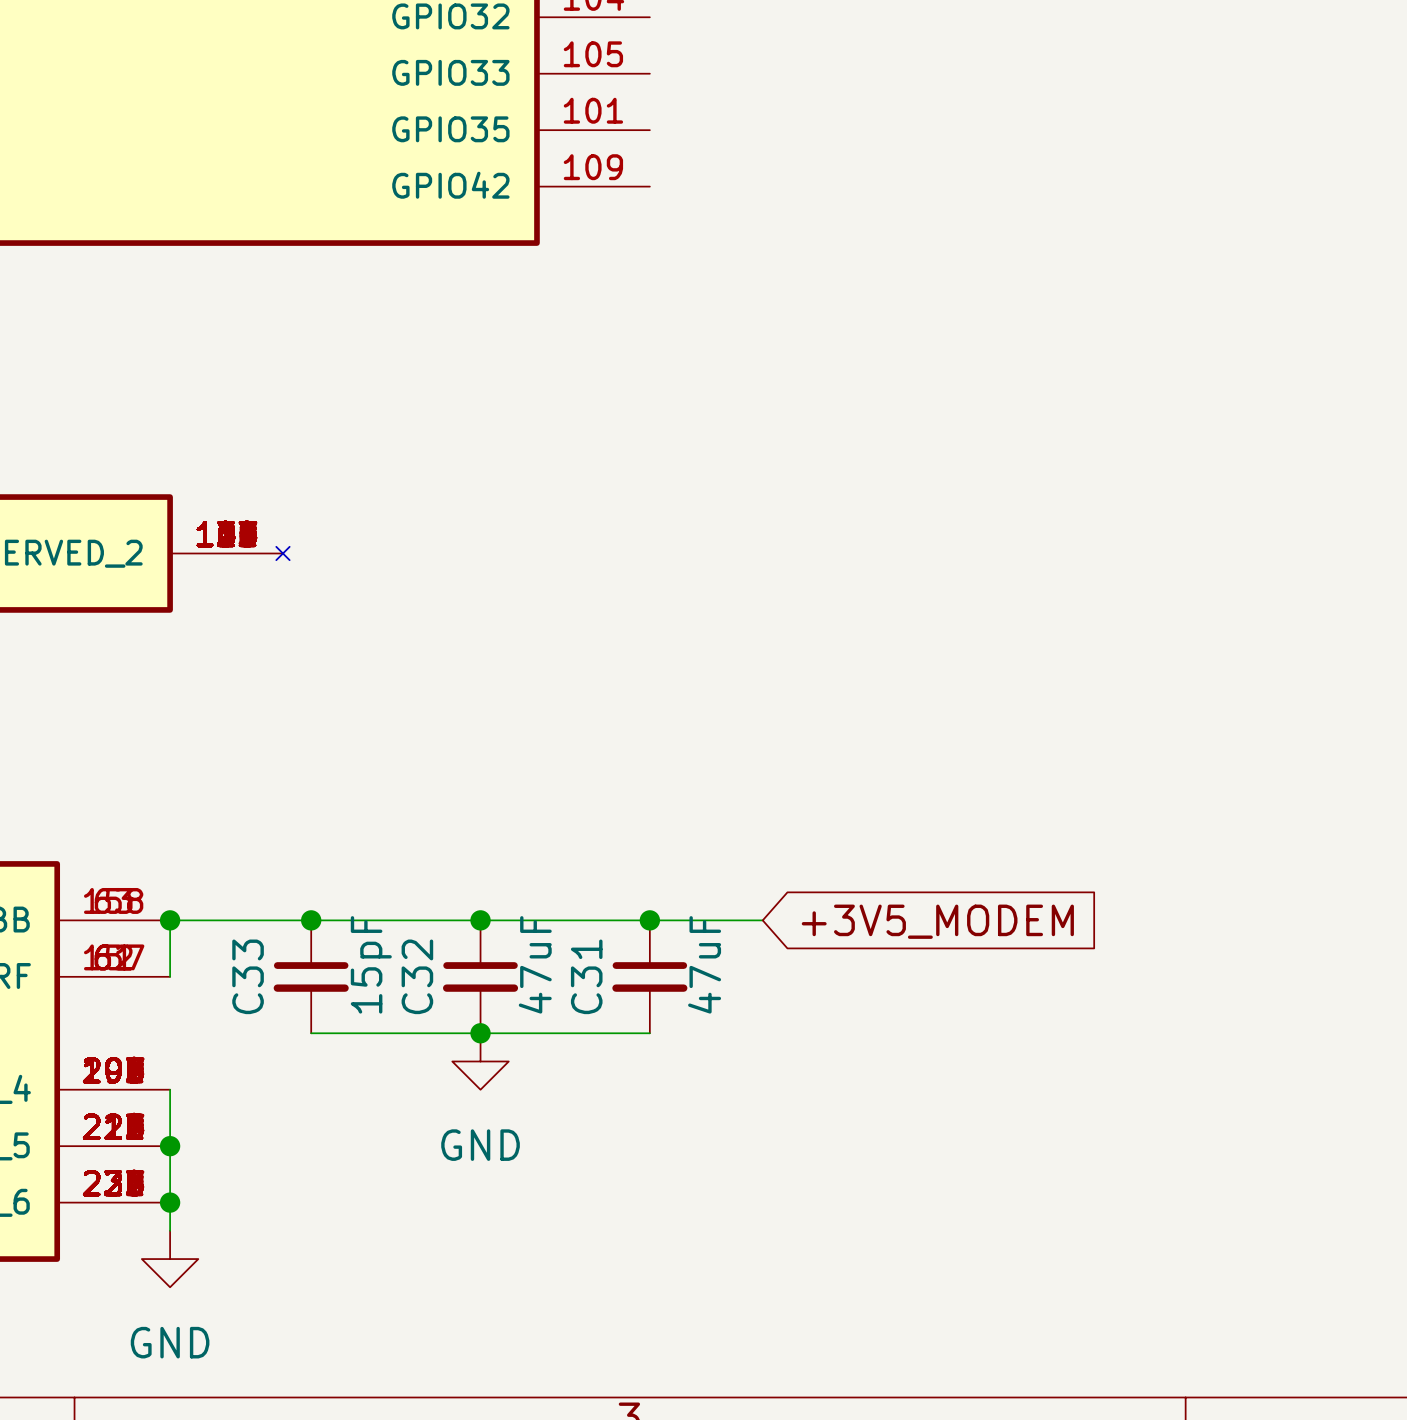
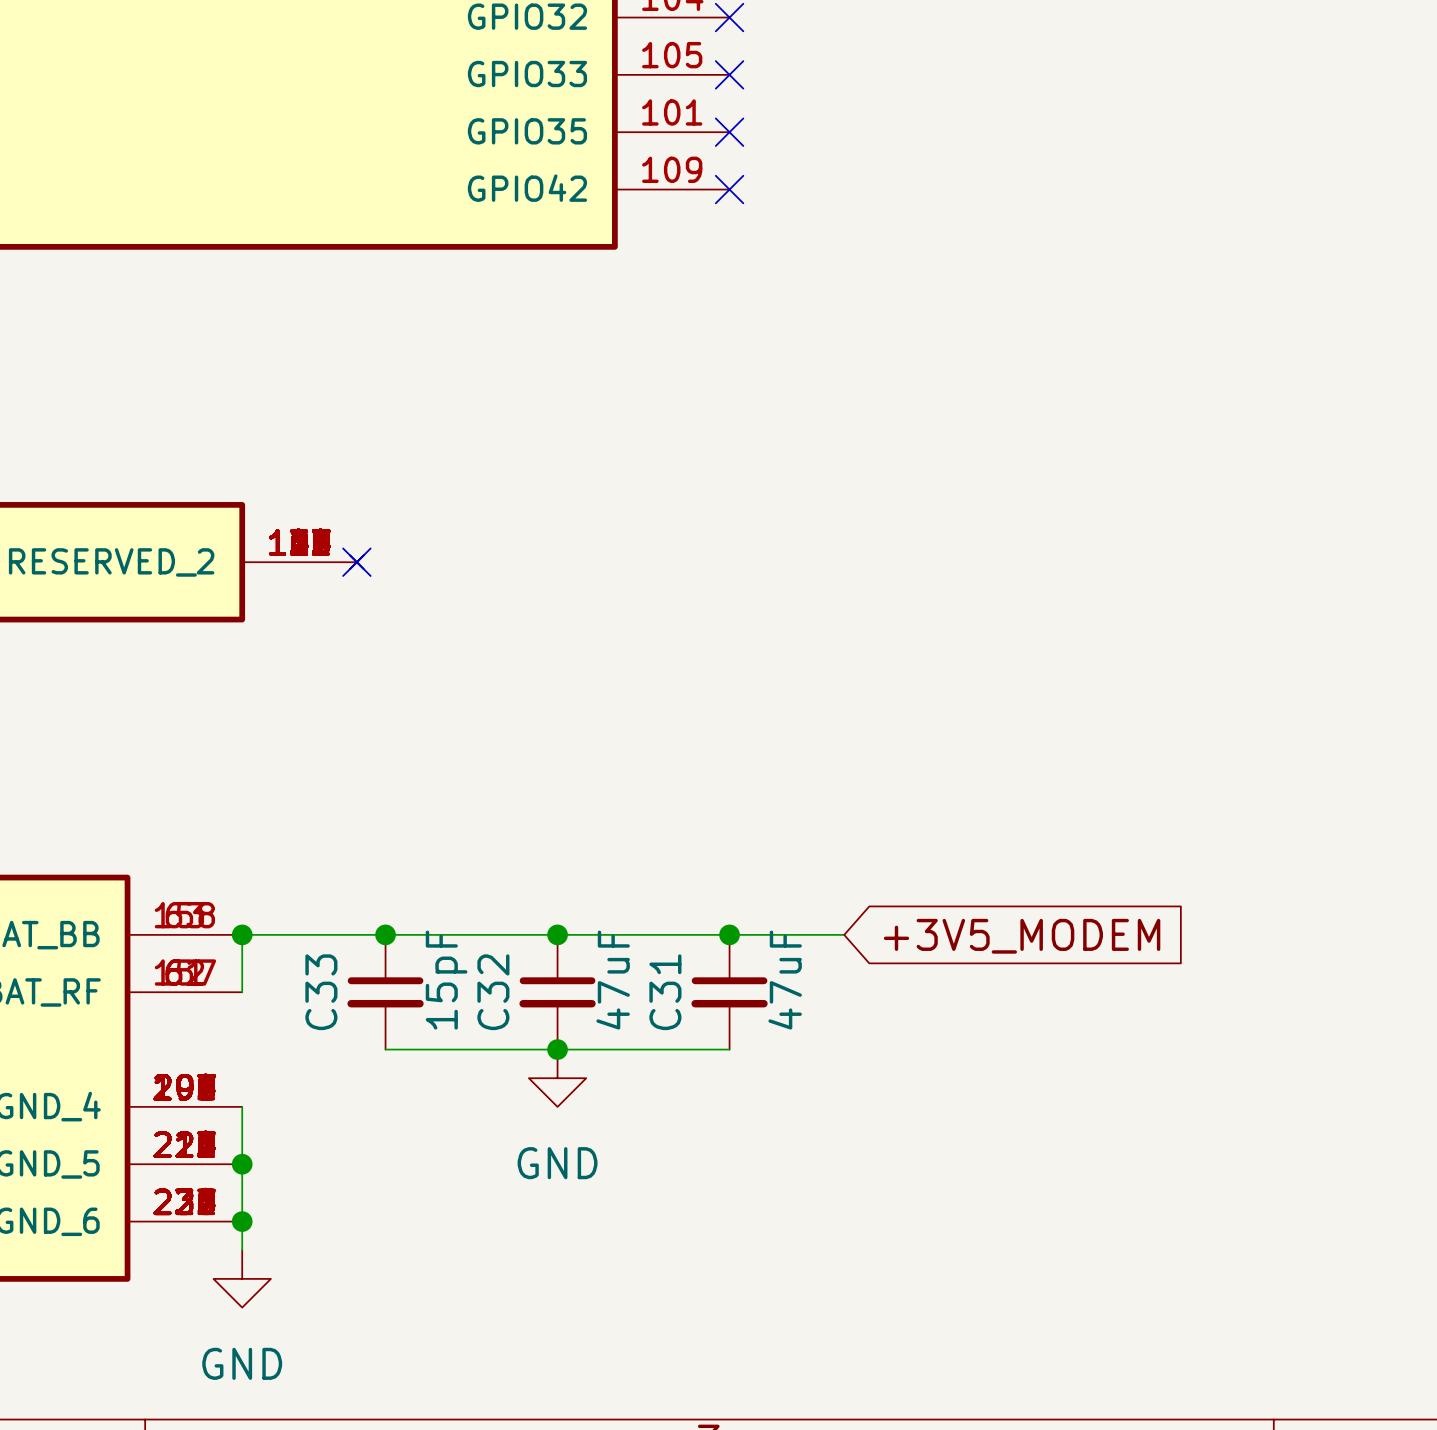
no-connect mark: none -> (729, 17)
no-connect mark: none -> (729, 74)
no-connect mark: none -> (729, 132)
no-connect mark: none -> (729, 189)
no-connect mark: none -> (356, 562)

